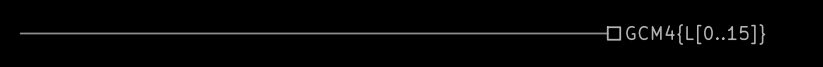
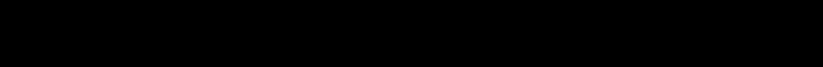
bus: (20, 33) (607, 33) -> none
hierarchical label: GCM4{L[0..15]} (695, 34) -> none

